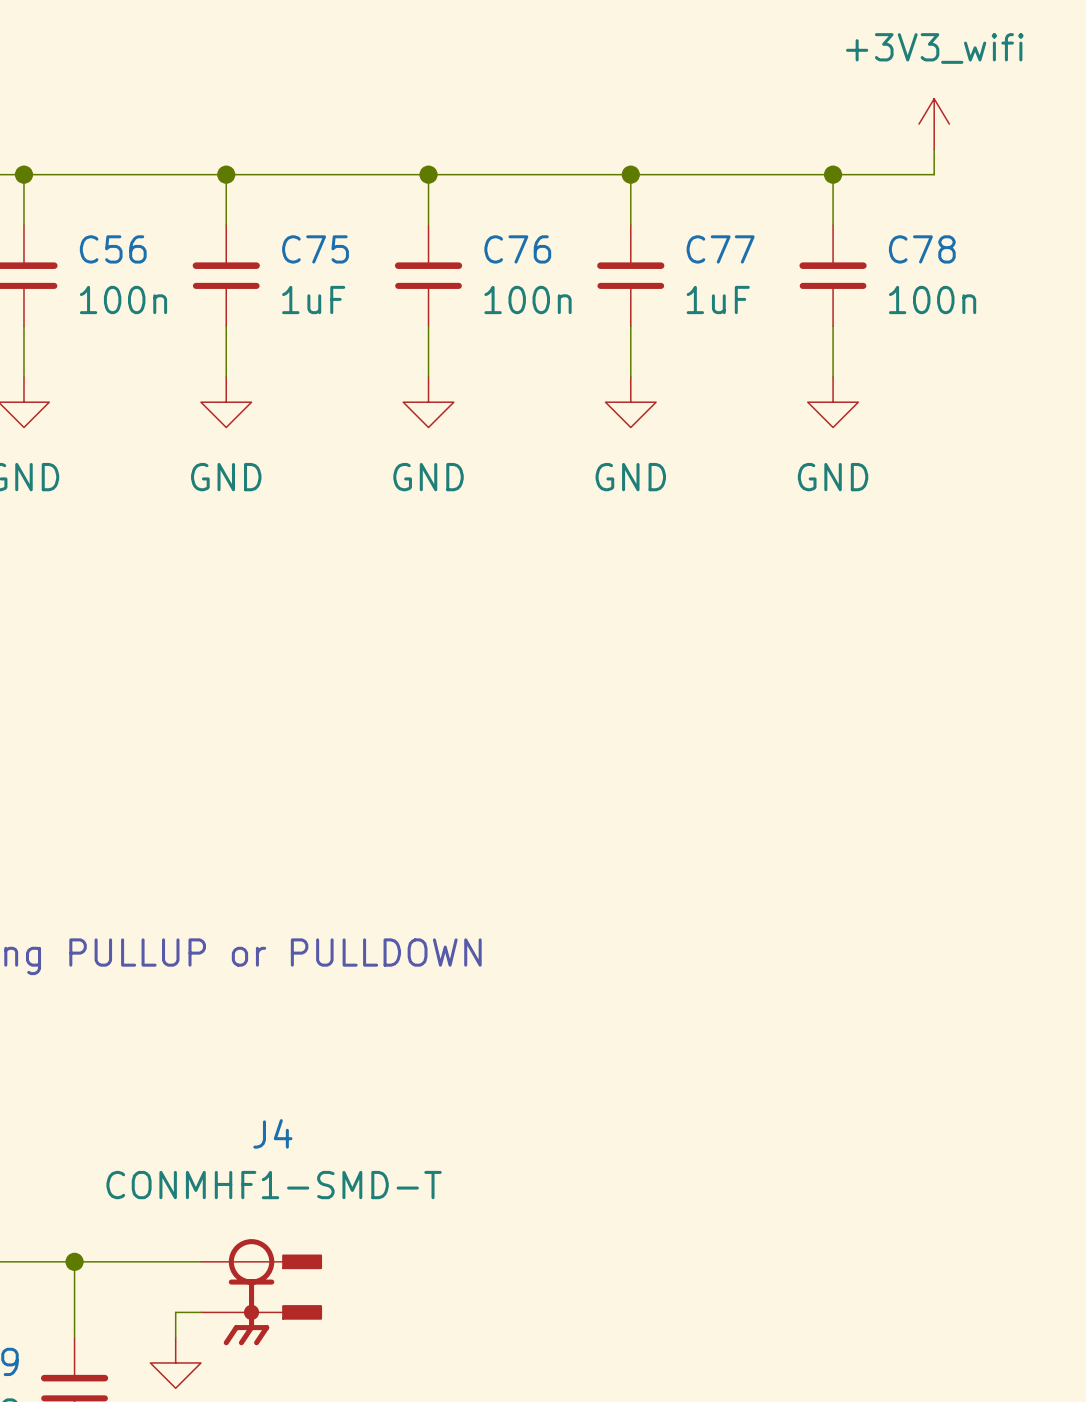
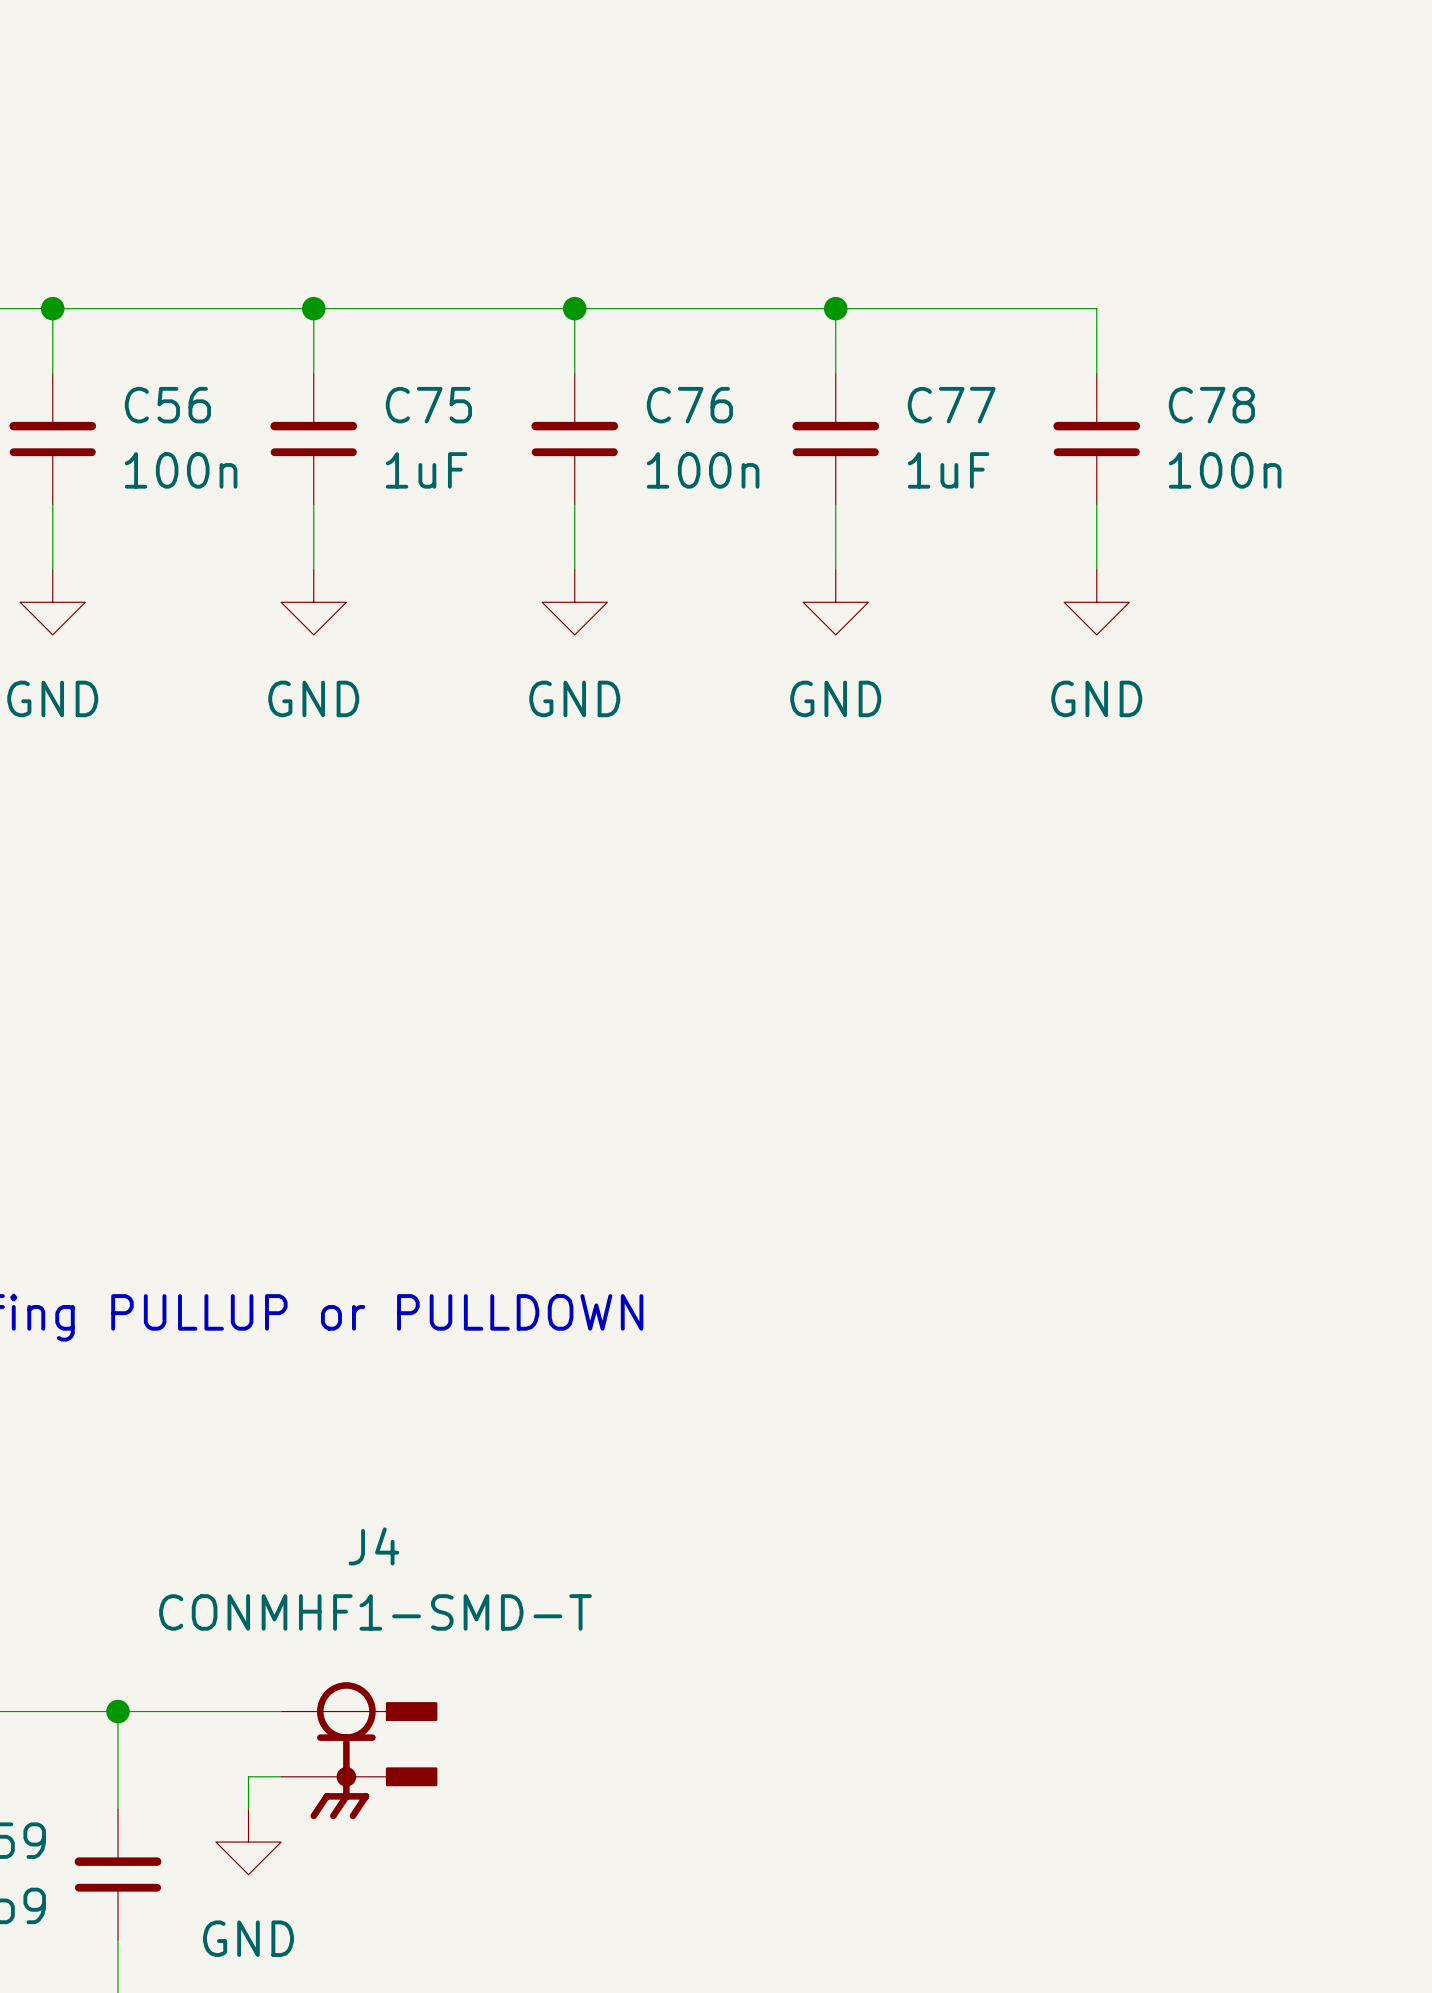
power symbol: +3V3_wifi (934, 124) -> none
wire: (934, 149) (934, 174) (833, 174) -> none
junction: (833, 174) -> none

